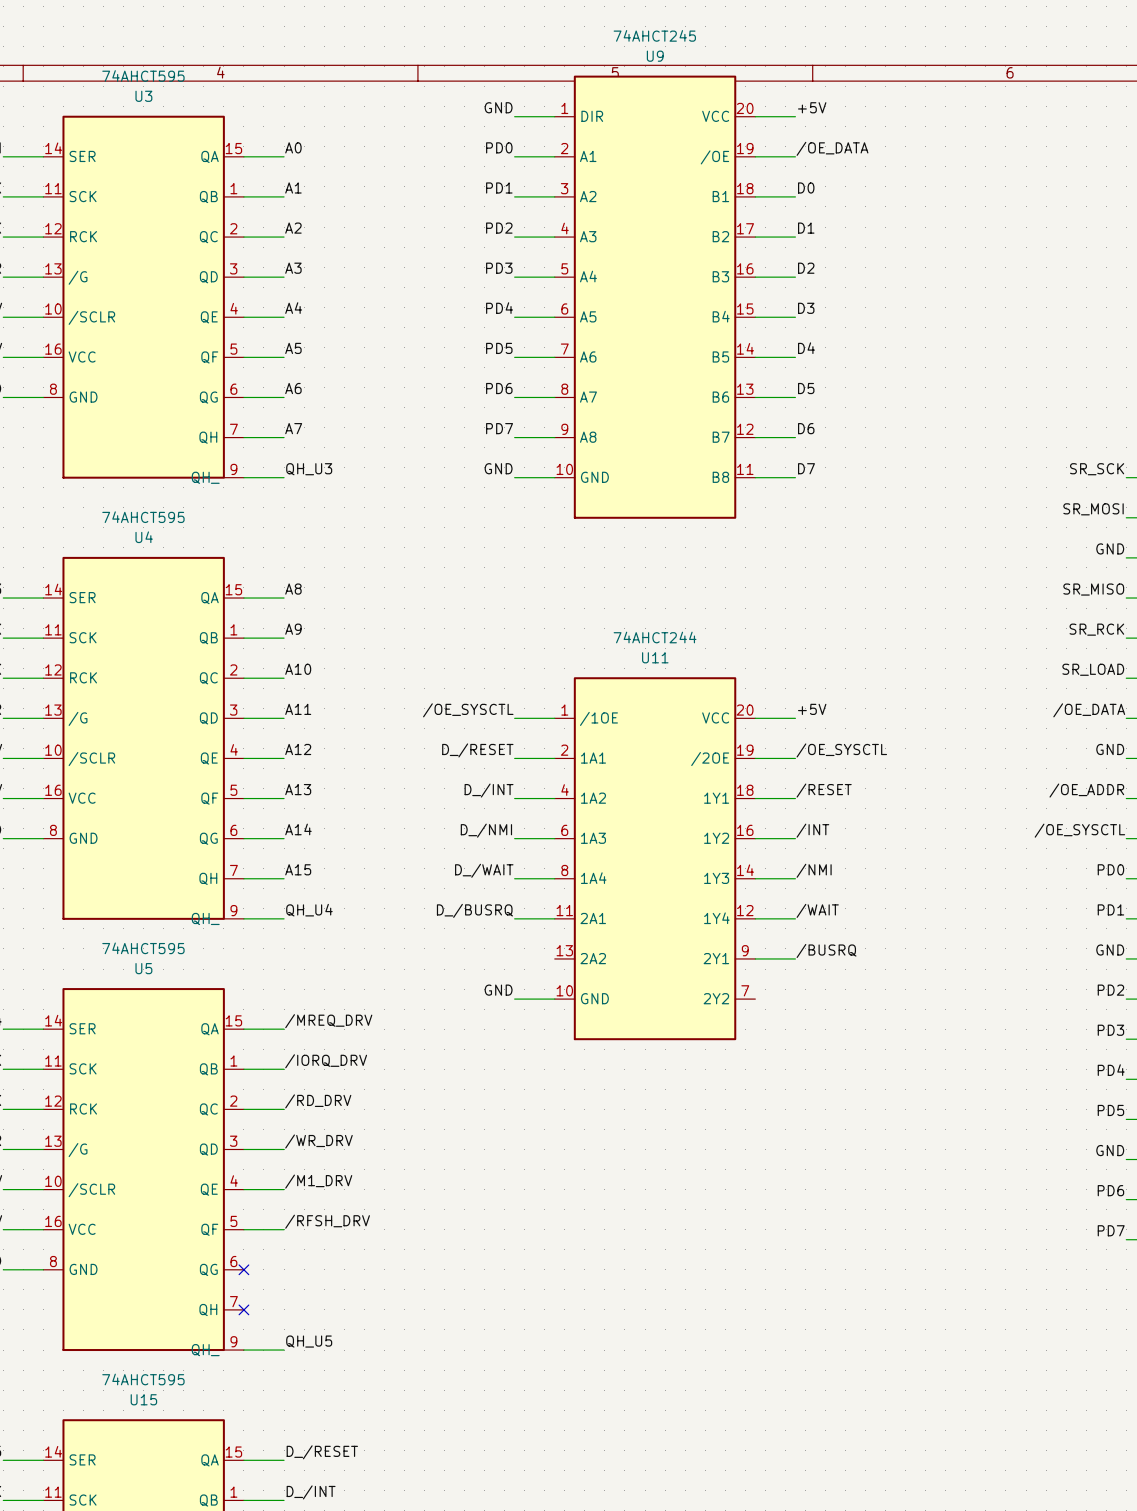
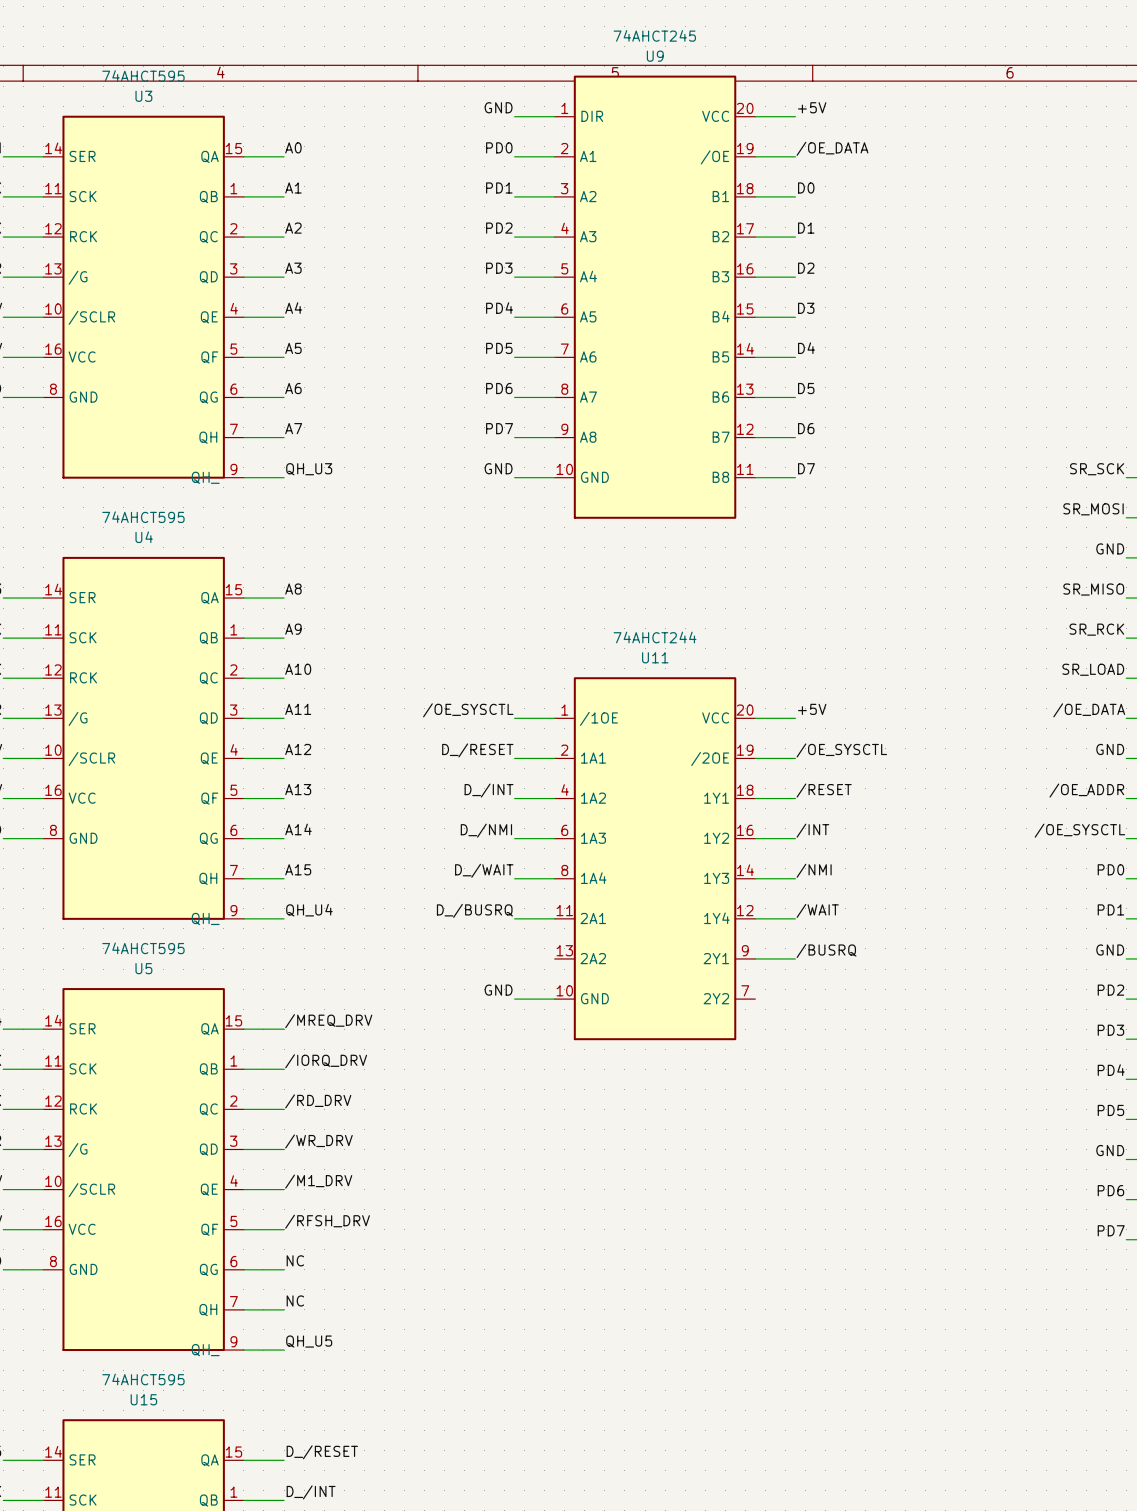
label: none -> NC (295, 1260)
wire: none -> (243, 1269) (284, 1269)
no-connect mark: (243, 1269) -> none
label: none -> NC (295, 1300)
wire: none -> (243, 1309) (284, 1309)
no-connect mark: (243, 1309) -> none

